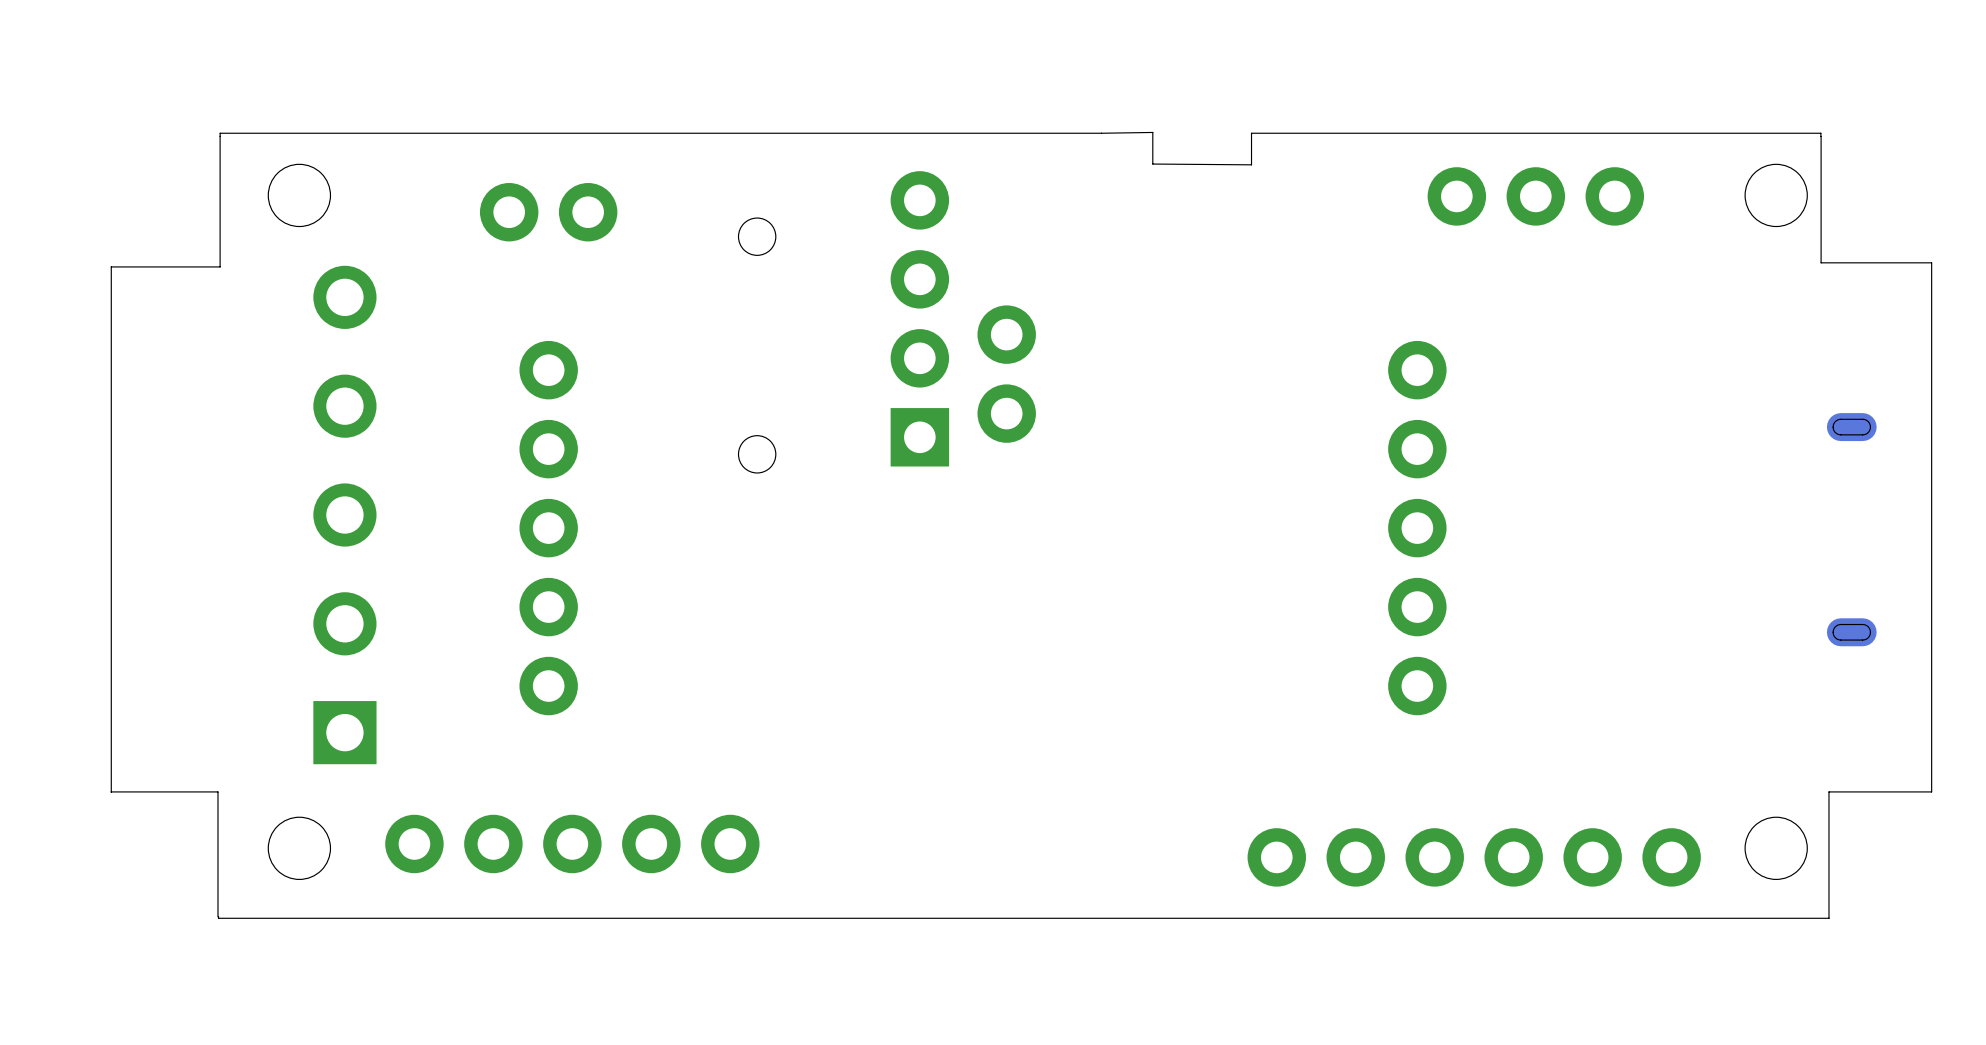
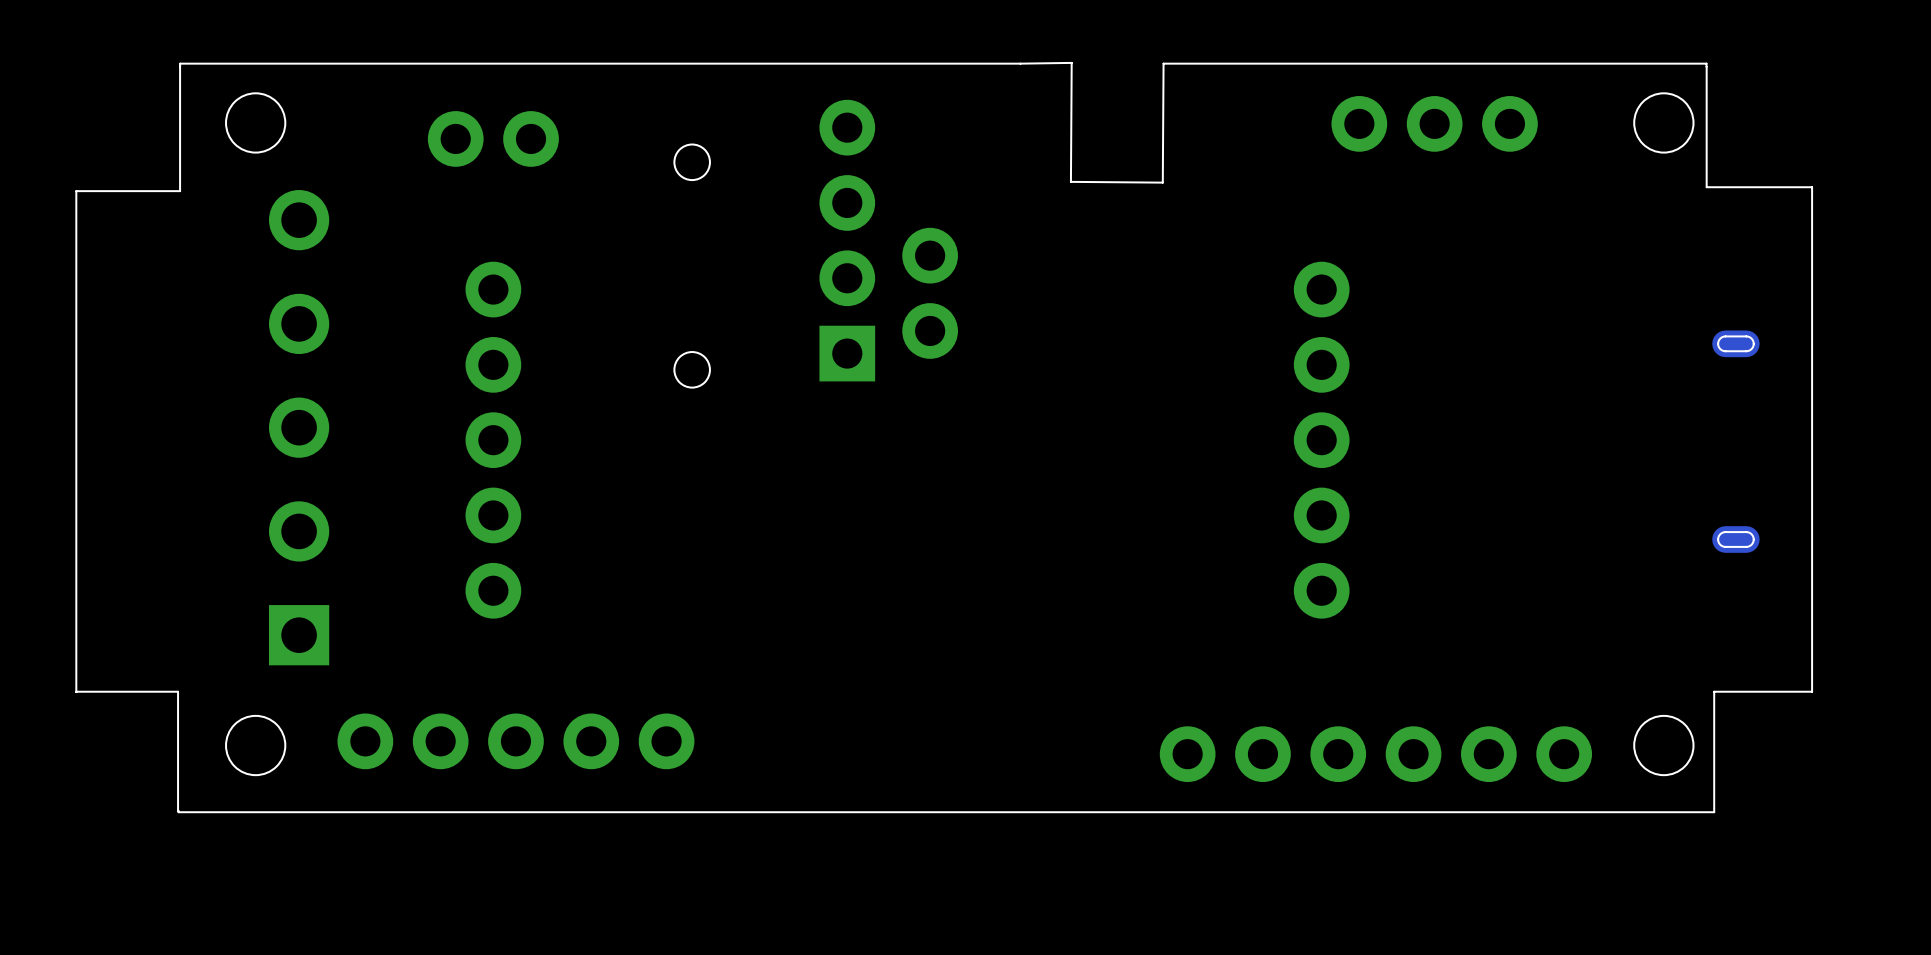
board edge: (1251, 133) (1251, 164) (1152, 164) (1152, 132) (1101, 133) -> (1163, 63) (1162, 182) (1070, 181) (1071, 62) (1020, 63)

